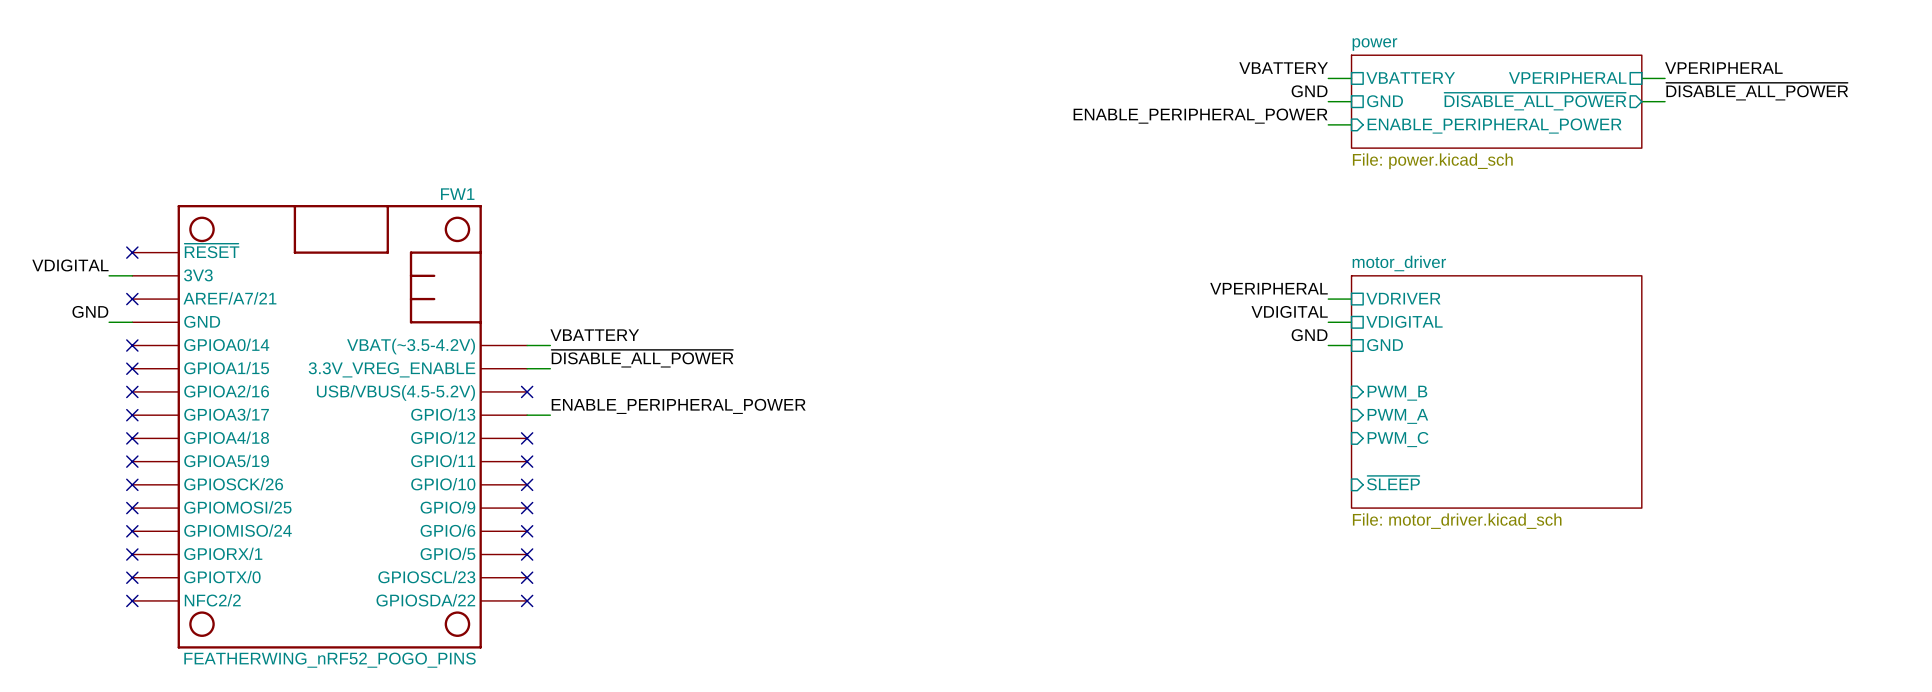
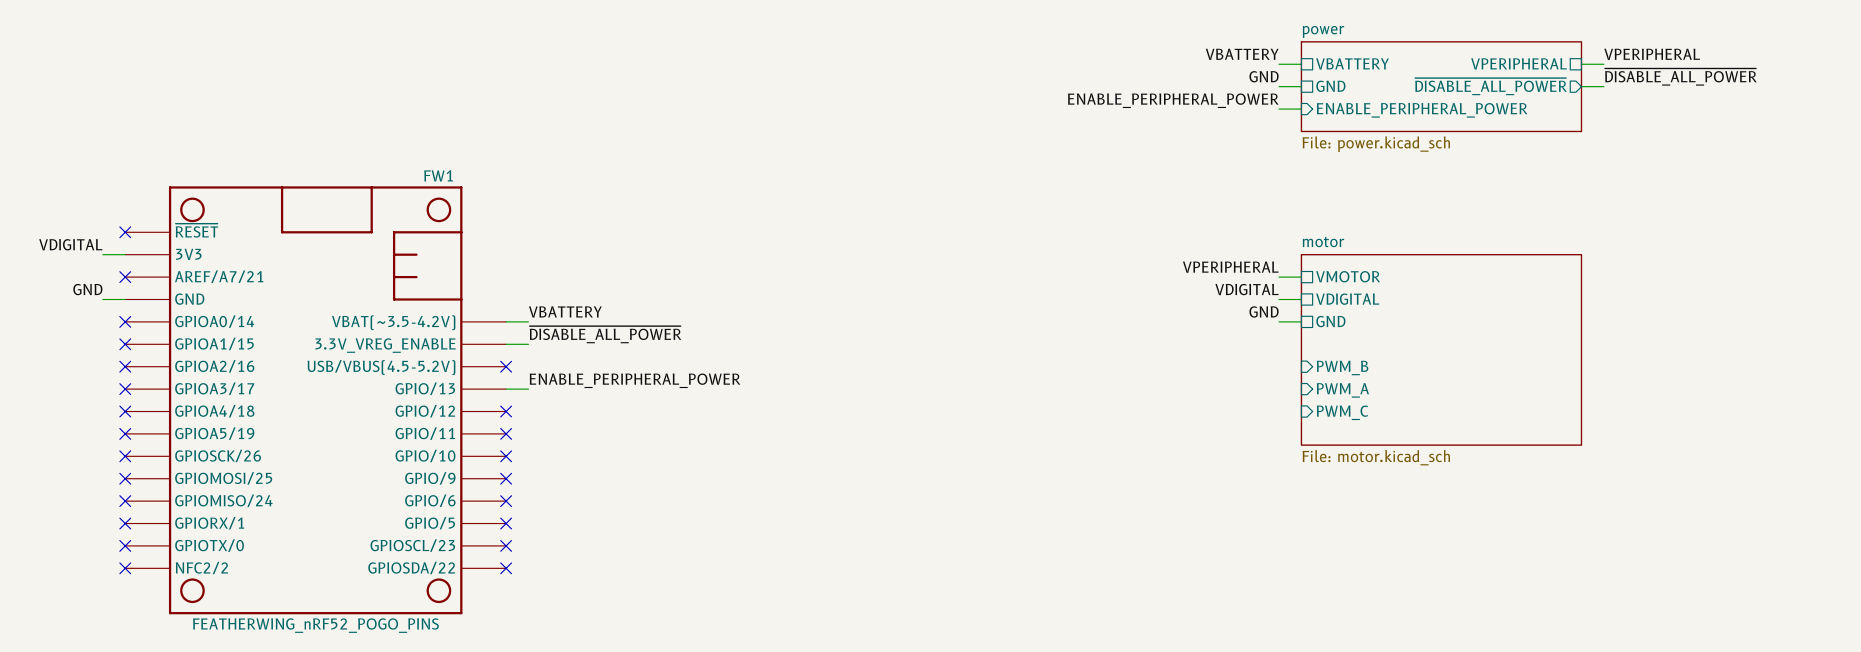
sheet pin: VDRIVER (1403, 298) -> VMOTOR (1348, 276)
sheet motor: none -> File: motor.kicad_sch (1441, 349)
sheet motor_driver: File: motor_driver.kicad_sch (1496, 391) -> none
sheet pin: ~{SLEEP} (1393, 483) -> none

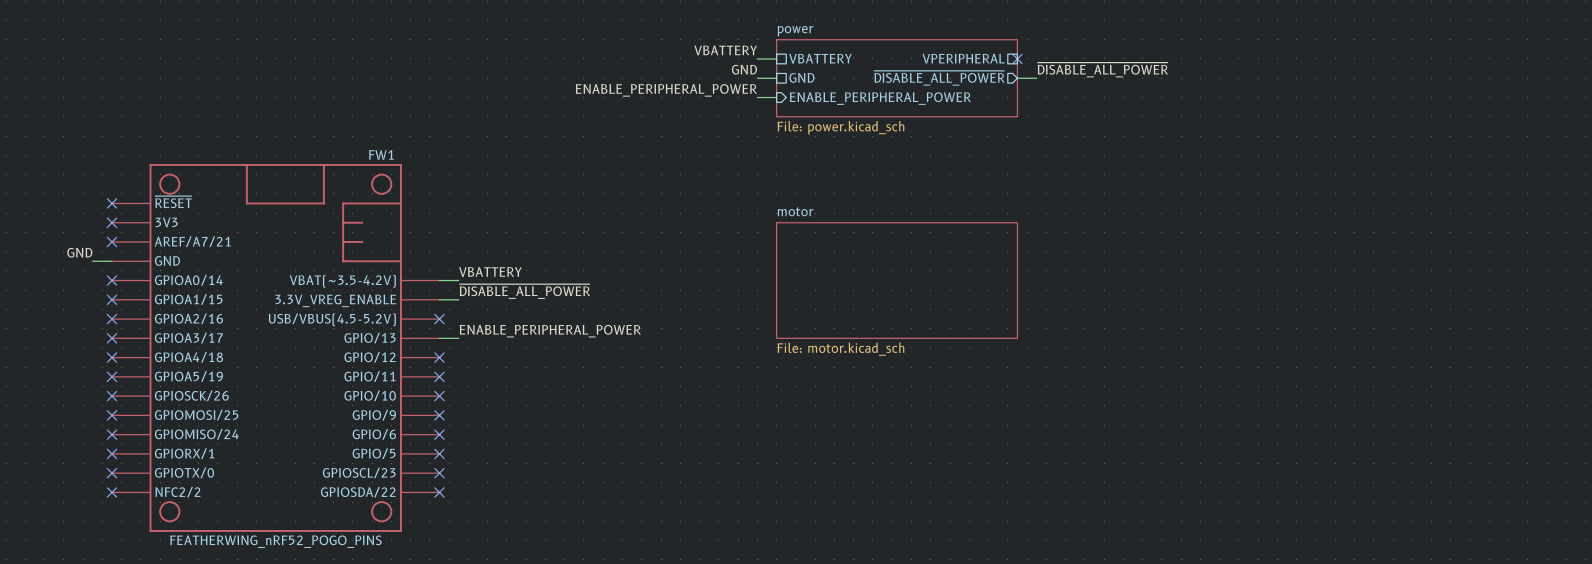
label: none -> VBATTERY (725, 50)
label: VBATTERY (1242, 54) -> none
label: VPERIPHERAL (1652, 54) -> none
sheet pin: none -> VBATTERY (820, 58)
sheet pin: none -> VPERIPHERAL (963, 58)
sheet pin: VBATTERY (1352, 63) -> none
sheet pin: VPERIPHERAL (1519, 63) -> none
wire: none -> (757, 58) (776, 58)
no-connect mark: none -> (1017, 58)
wire: (1279, 64) (1301, 64) -> none
wire: (1581, 64) (1603, 64) -> none
label: none -> GND (744, 69)
label: GND (1264, 76) -> none
label: ~{DISABLE_ALL_POWER} (1680, 77) -> none
wire: none -> (757, 78) (776, 78)
sheet pin: none -> GND (801, 77)
sheet power: none -> File: power.kicad_sch (897, 78)
sheet pin: none -> ~{DISABLE_ALL_POWER} (939, 78)
wire: (1279, 86) (1301, 86) -> (1017, 78) (1036, 78)
sheet pin: GND (1330, 86) -> none
sheet power: File: power.kicad_sch (1441, 86) -> none
sheet pin: ~{DISABLE_ALL_POWER} (1490, 86) -> none
wire: (1581, 86) (1603, 86) -> none
label: none -> ENABLE_PERIPHERAL_POWER (666, 90)
label: ENABLE_PERIPHERAL_POWER (1173, 100) -> ~{DISABLE_ALL_POWER} (1102, 69)
wire: none -> (757, 97) (776, 97)
wire: (1279, 109) (1301, 109) -> none
sheet pin: none -> ENABLE_PERIPHERAL_POWER (880, 98)
sheet pin: ENABLE_PERIPHERAL_POWER (1422, 110) -> none
label: VDIGITAL (70, 244) -> none
wire: (102, 254) (125, 254) -> none
no-connect mark: none -> (111, 222)
label: VPERIPHERAL (1230, 267) -> none
sheet pin: VMOTOR (1348, 276) -> none
wire: (1279, 277) (1301, 277) -> none
label: VDIGITAL (1247, 289) -> none
wire: (1279, 299) (1301, 299) -> none
sheet pin: VDIGITAL (1347, 299) -> none
label: GND (1264, 311) -> none
sheet motor: none -> File: motor.kicad_sch (897, 280)
wire: (1279, 321) (1301, 321) -> none
sheet pin: GND (1330, 321) -> none
sheet motor: File: motor.kicad_sch (1441, 349) -> none
sheet pin: PWM_B (1342, 367) -> none
sheet pin: PWM_A (1342, 390) -> none
sheet pin: PWM_C (1342, 412) -> none

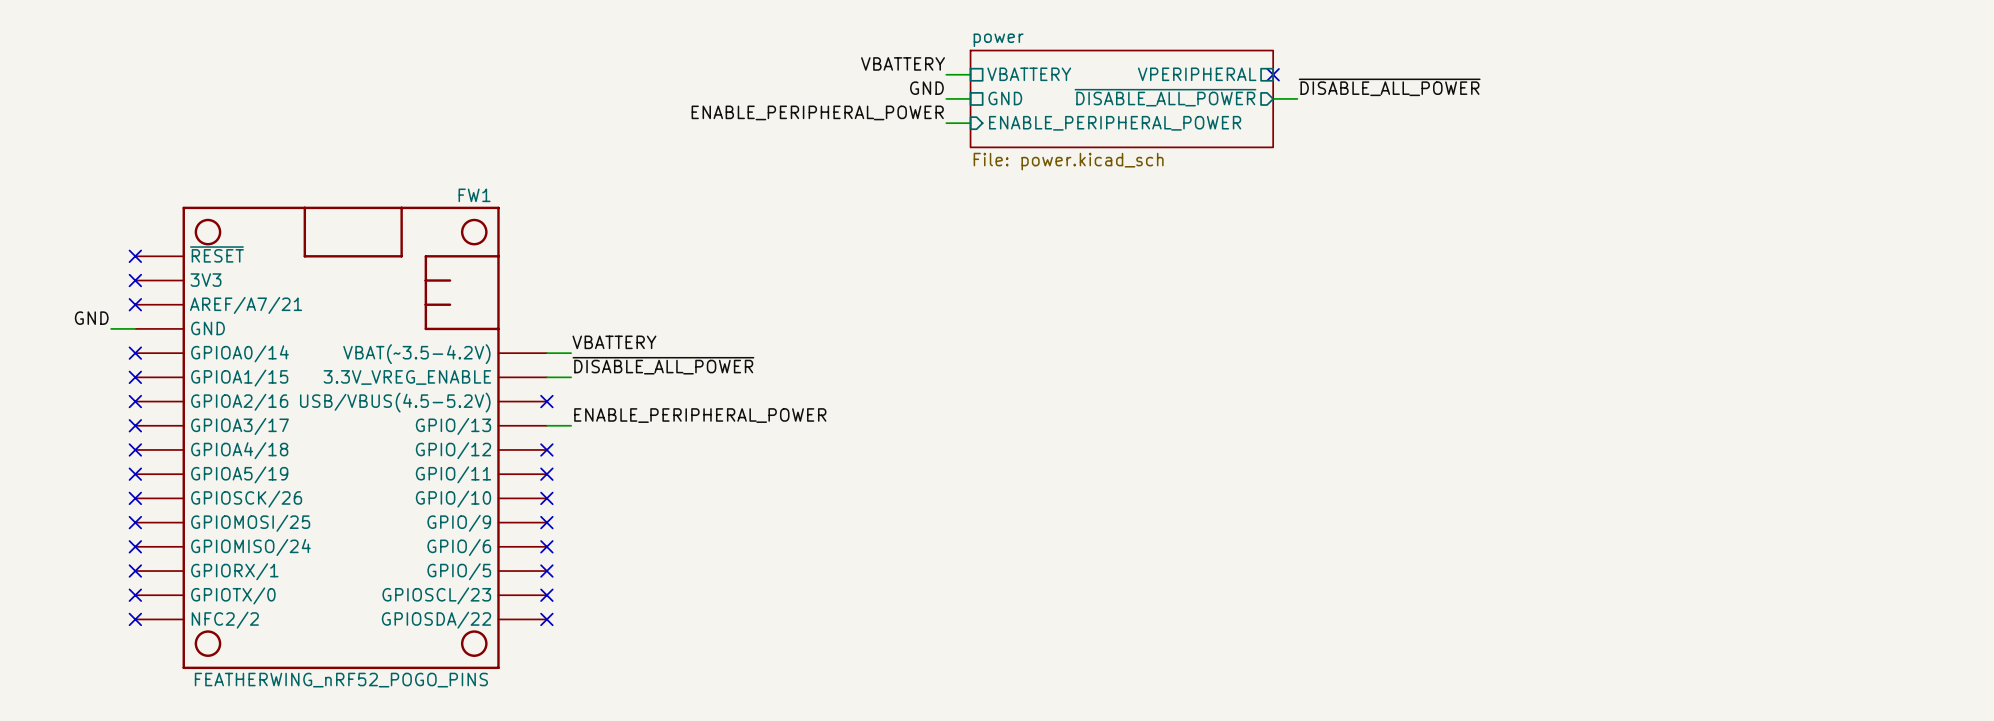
sheet motor: File: motor.kicad_sch (897, 280) -> none

